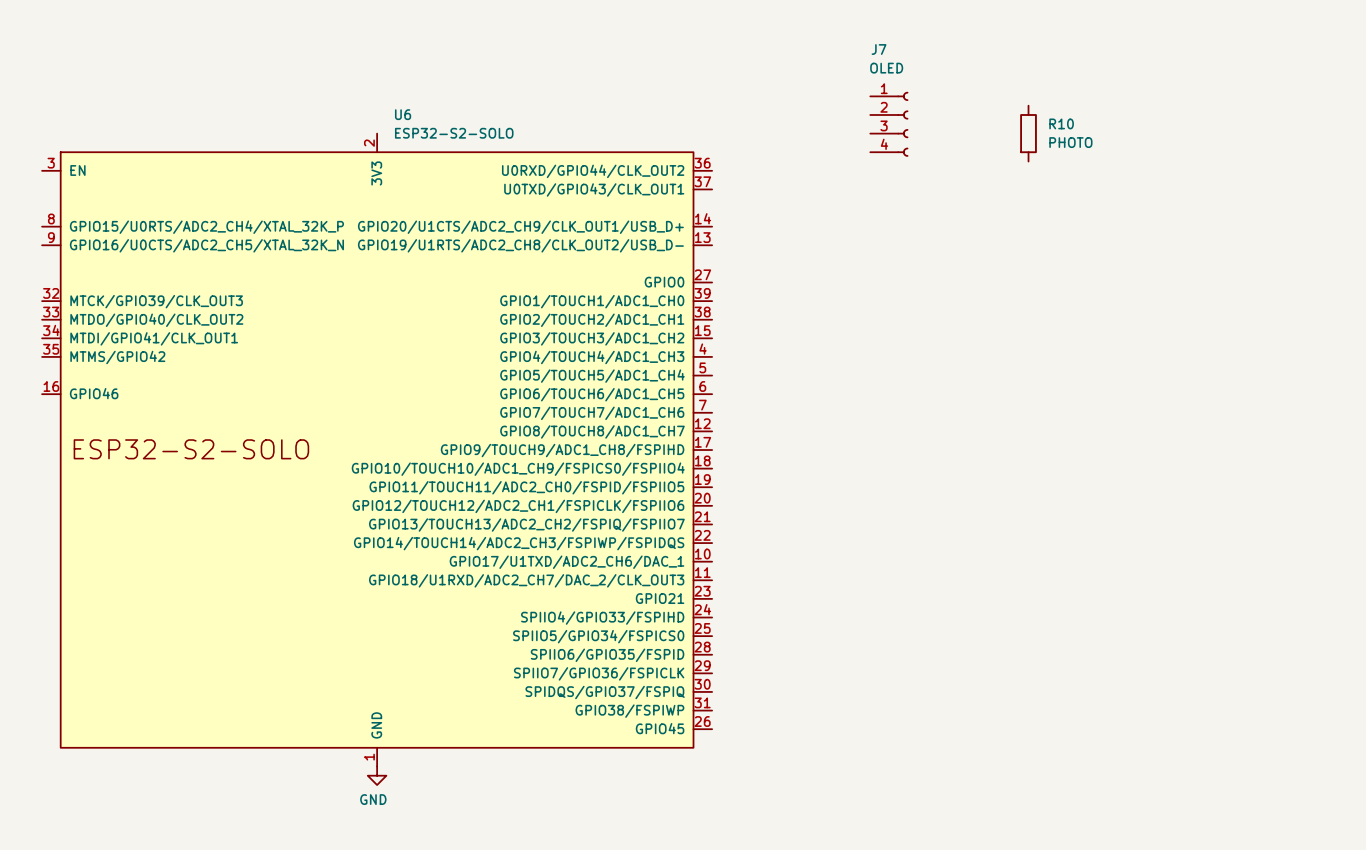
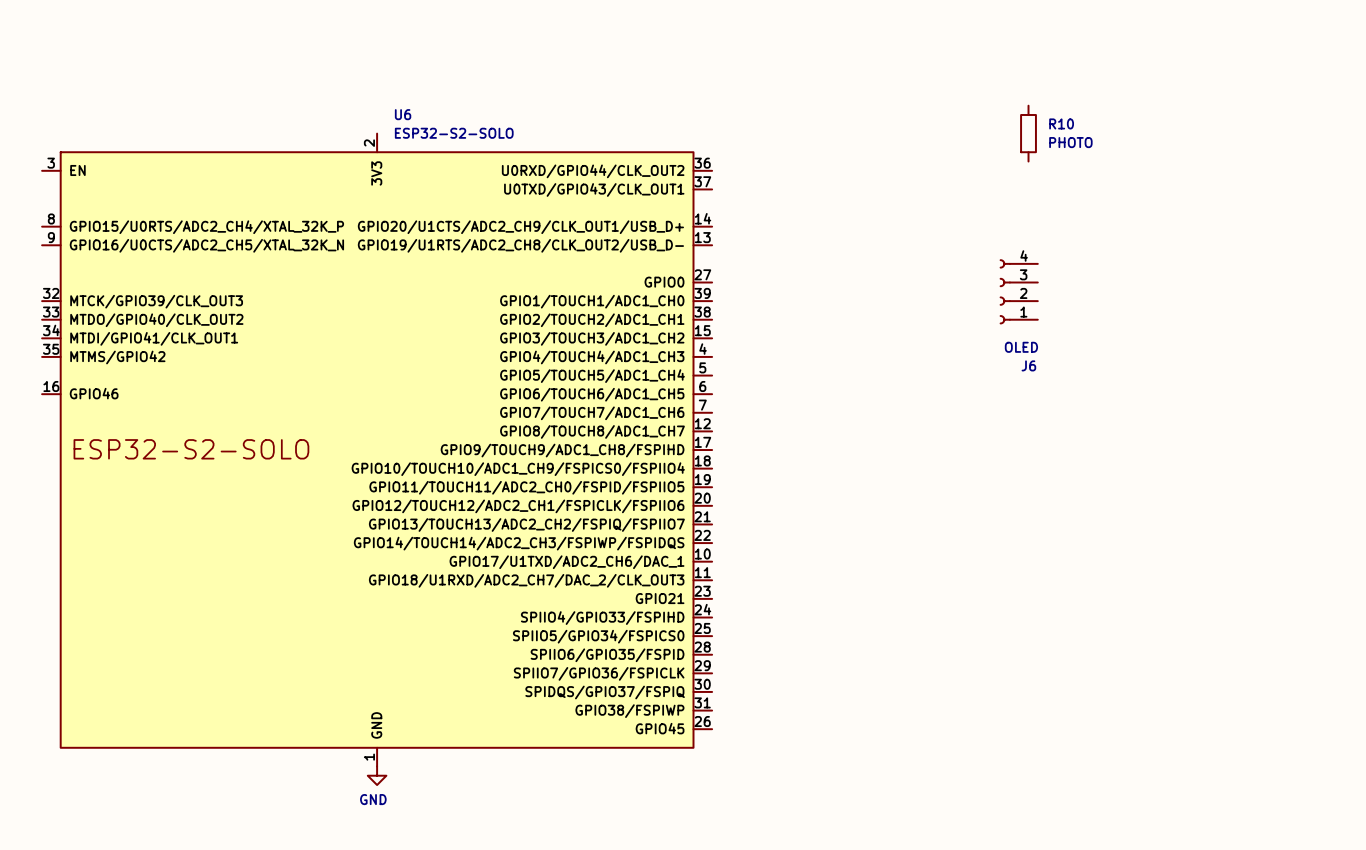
J7: OLED (889, 124) -> none
J6: none -> OLED (1018, 291)

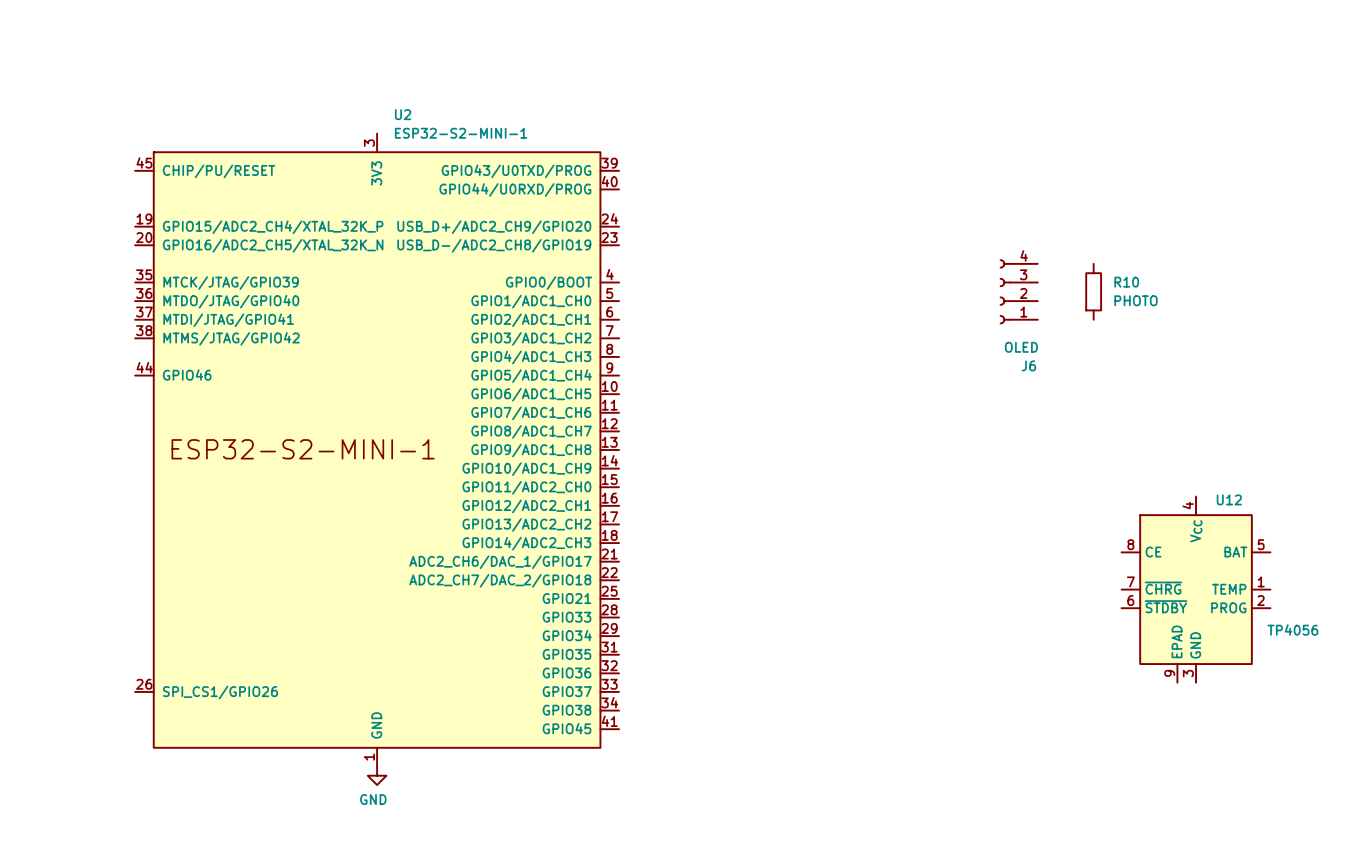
R10 position: (1028, 133) -> (1093, 291)
U6: ESP32-S2-SOLO (377, 450) -> none
U2: none -> ESP32-S2-MINI-1 (377, 450)
U12: none -> TP4056 (1196, 589)

